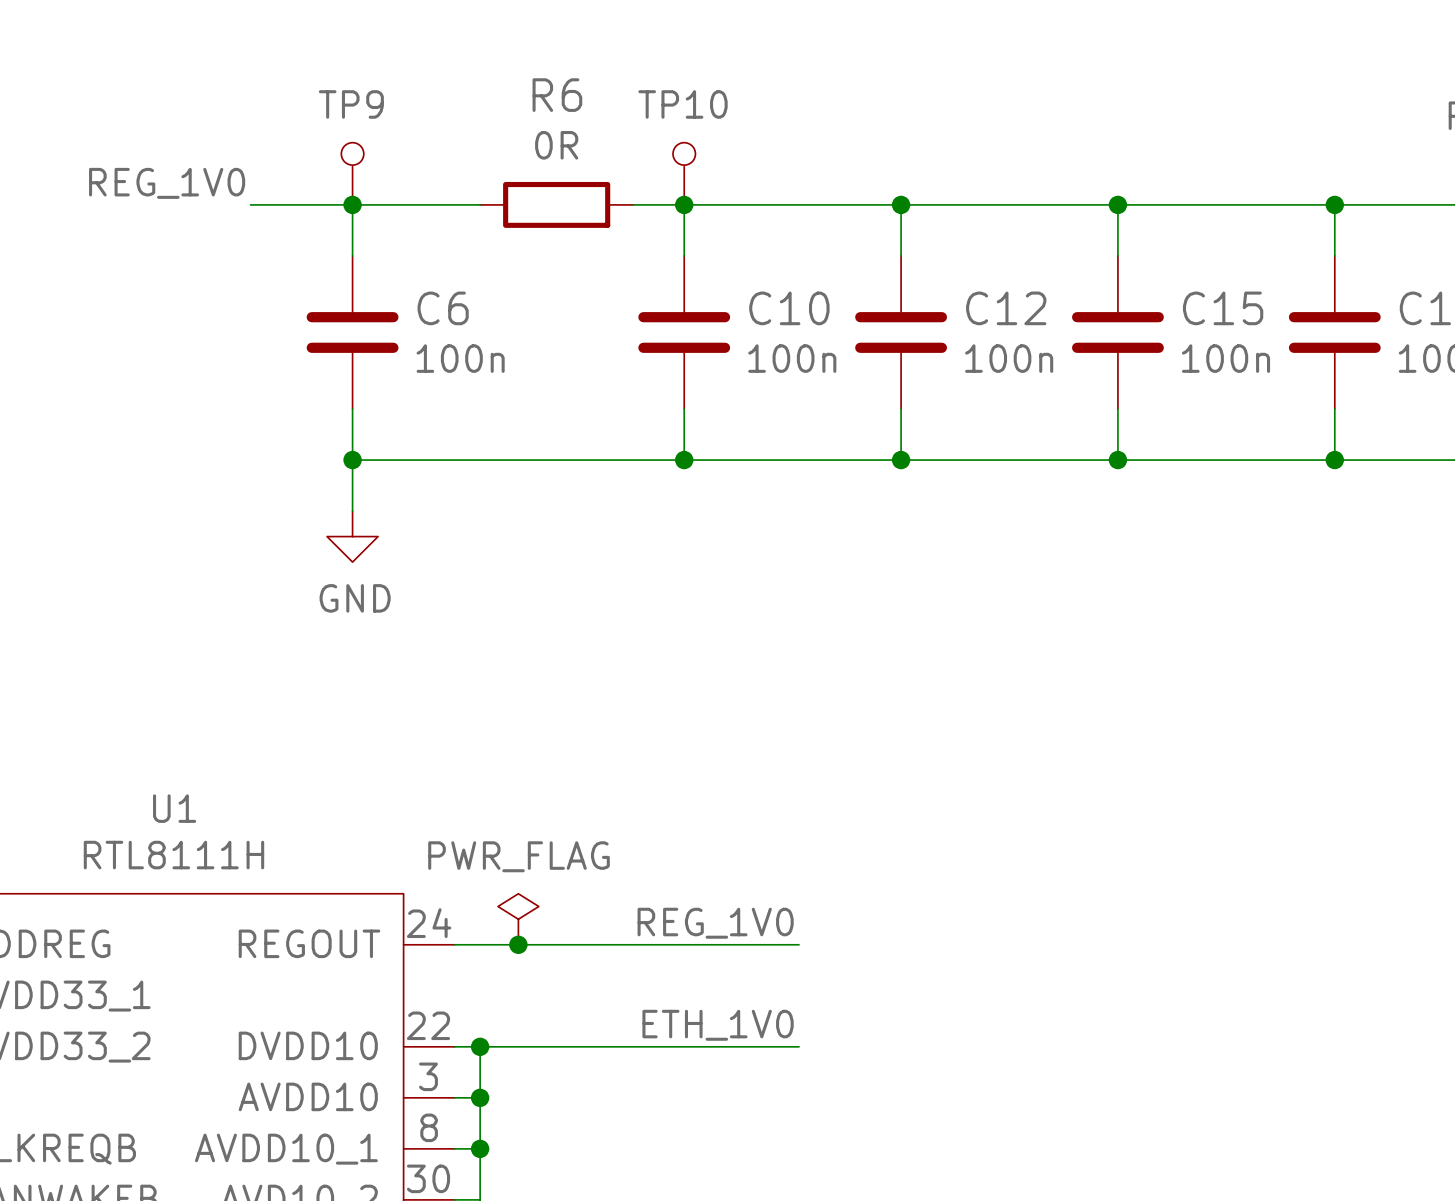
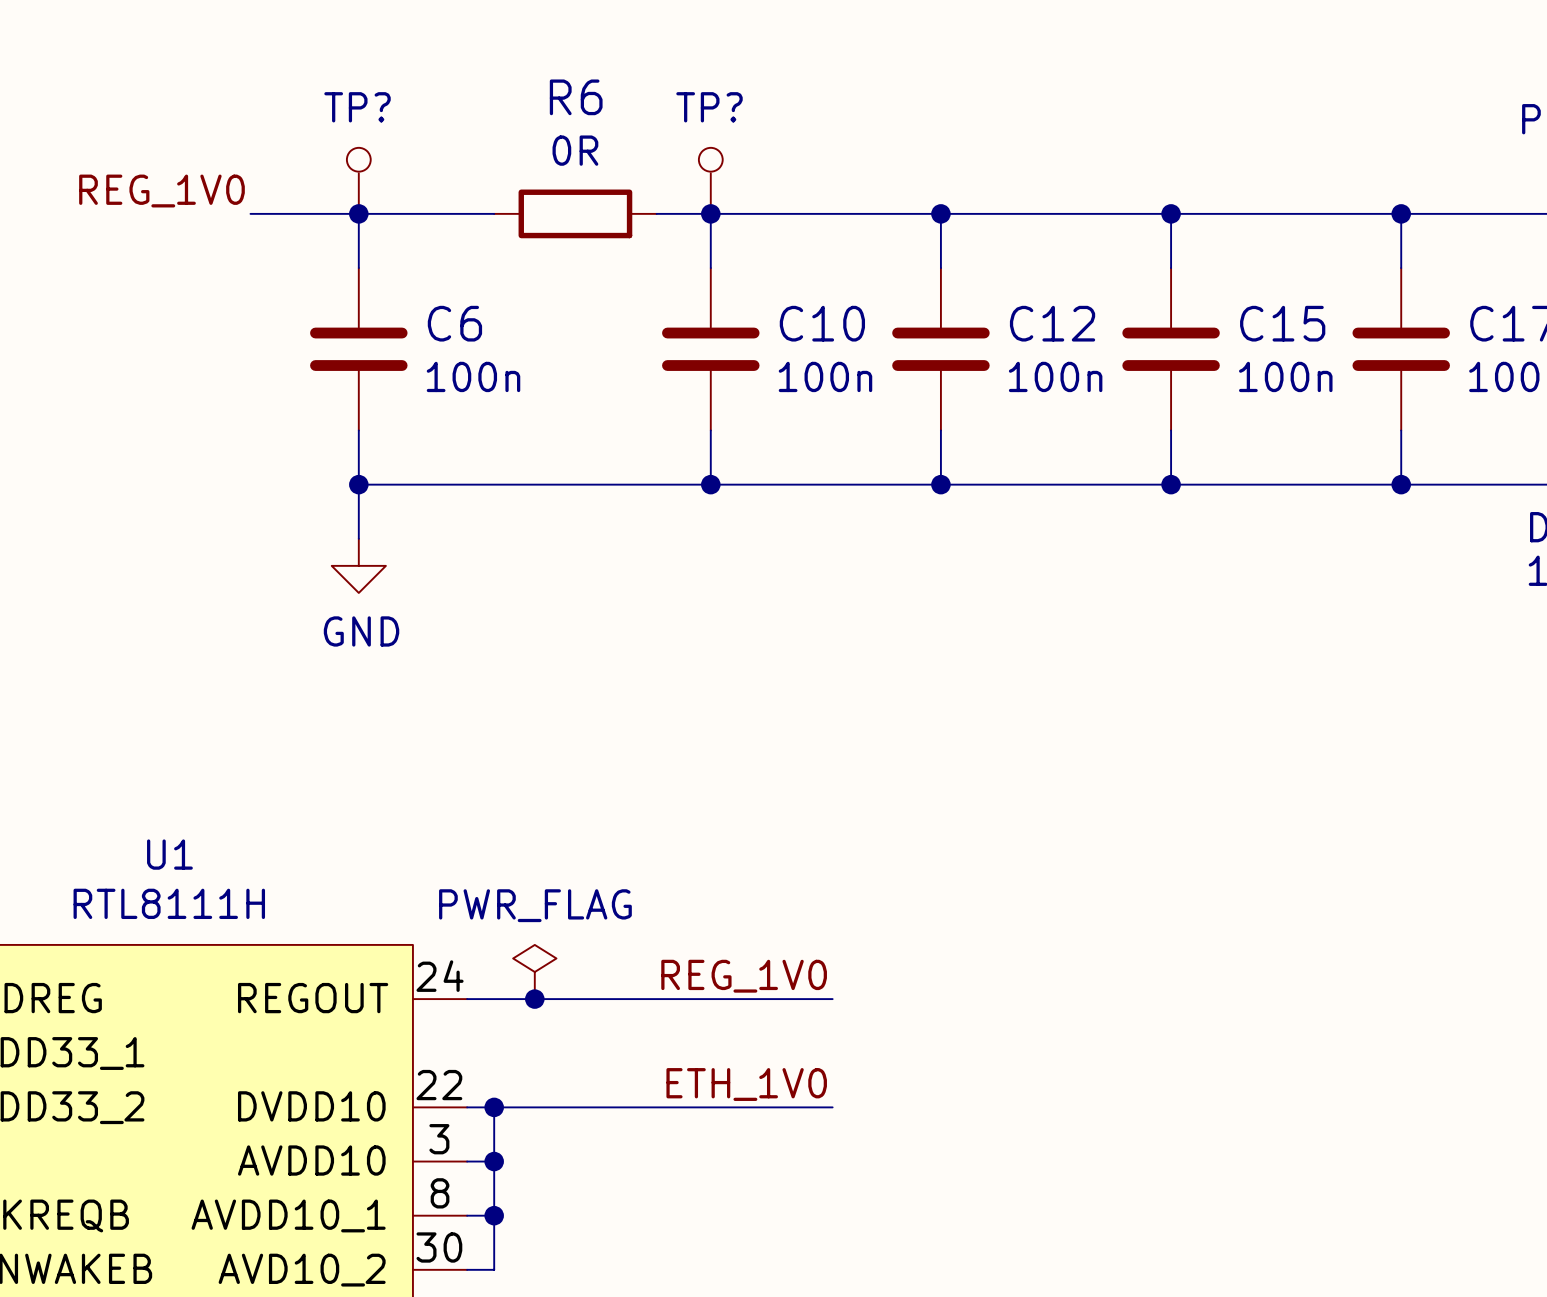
TP9 name: TP9 (351, 104) -> TP? (357, 107)
TP10 name: TP10 (683, 104) -> TP? (709, 107)

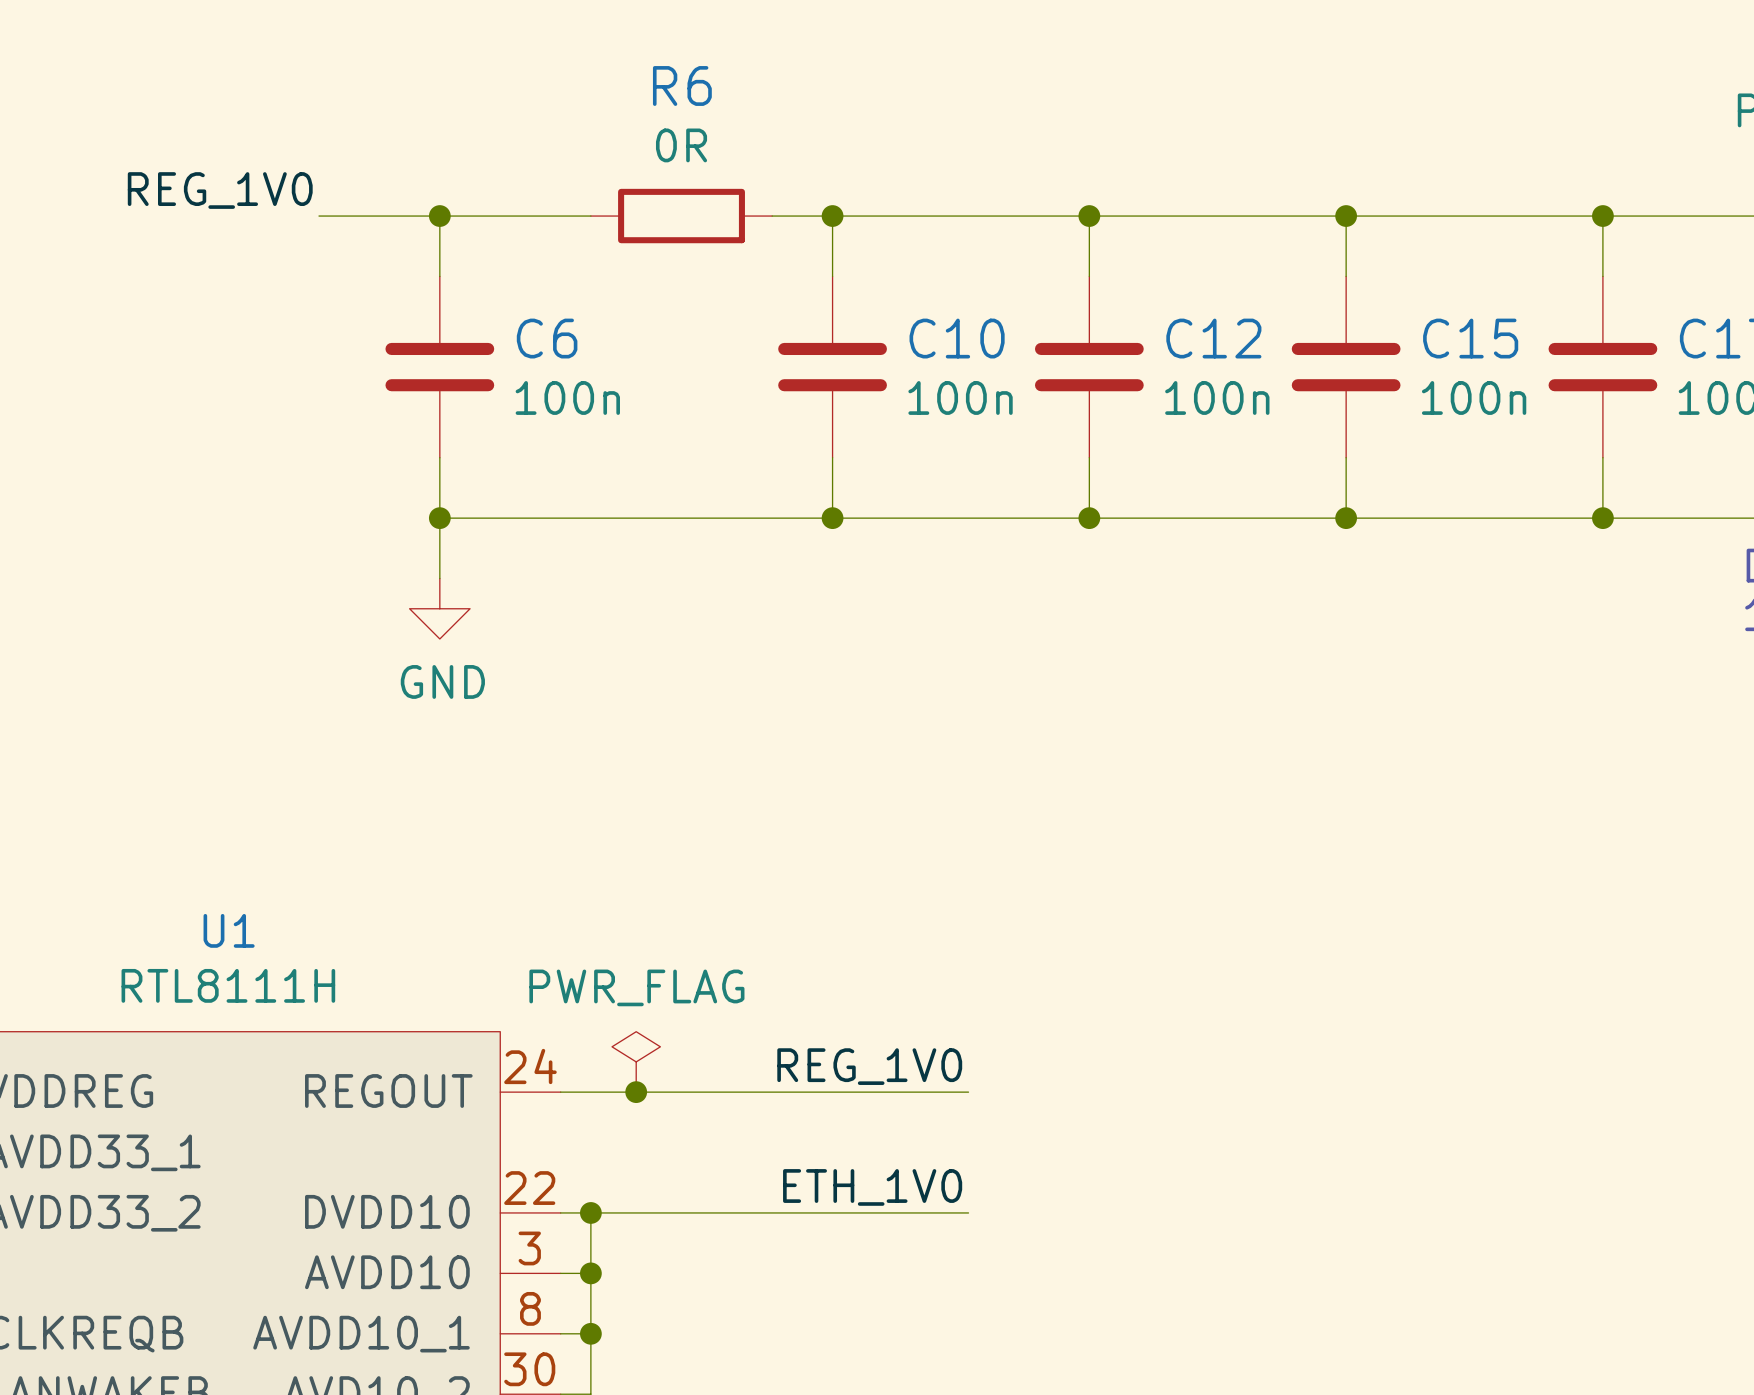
TP?: (358, 180) -> none
TP?: (710, 180) -> none

